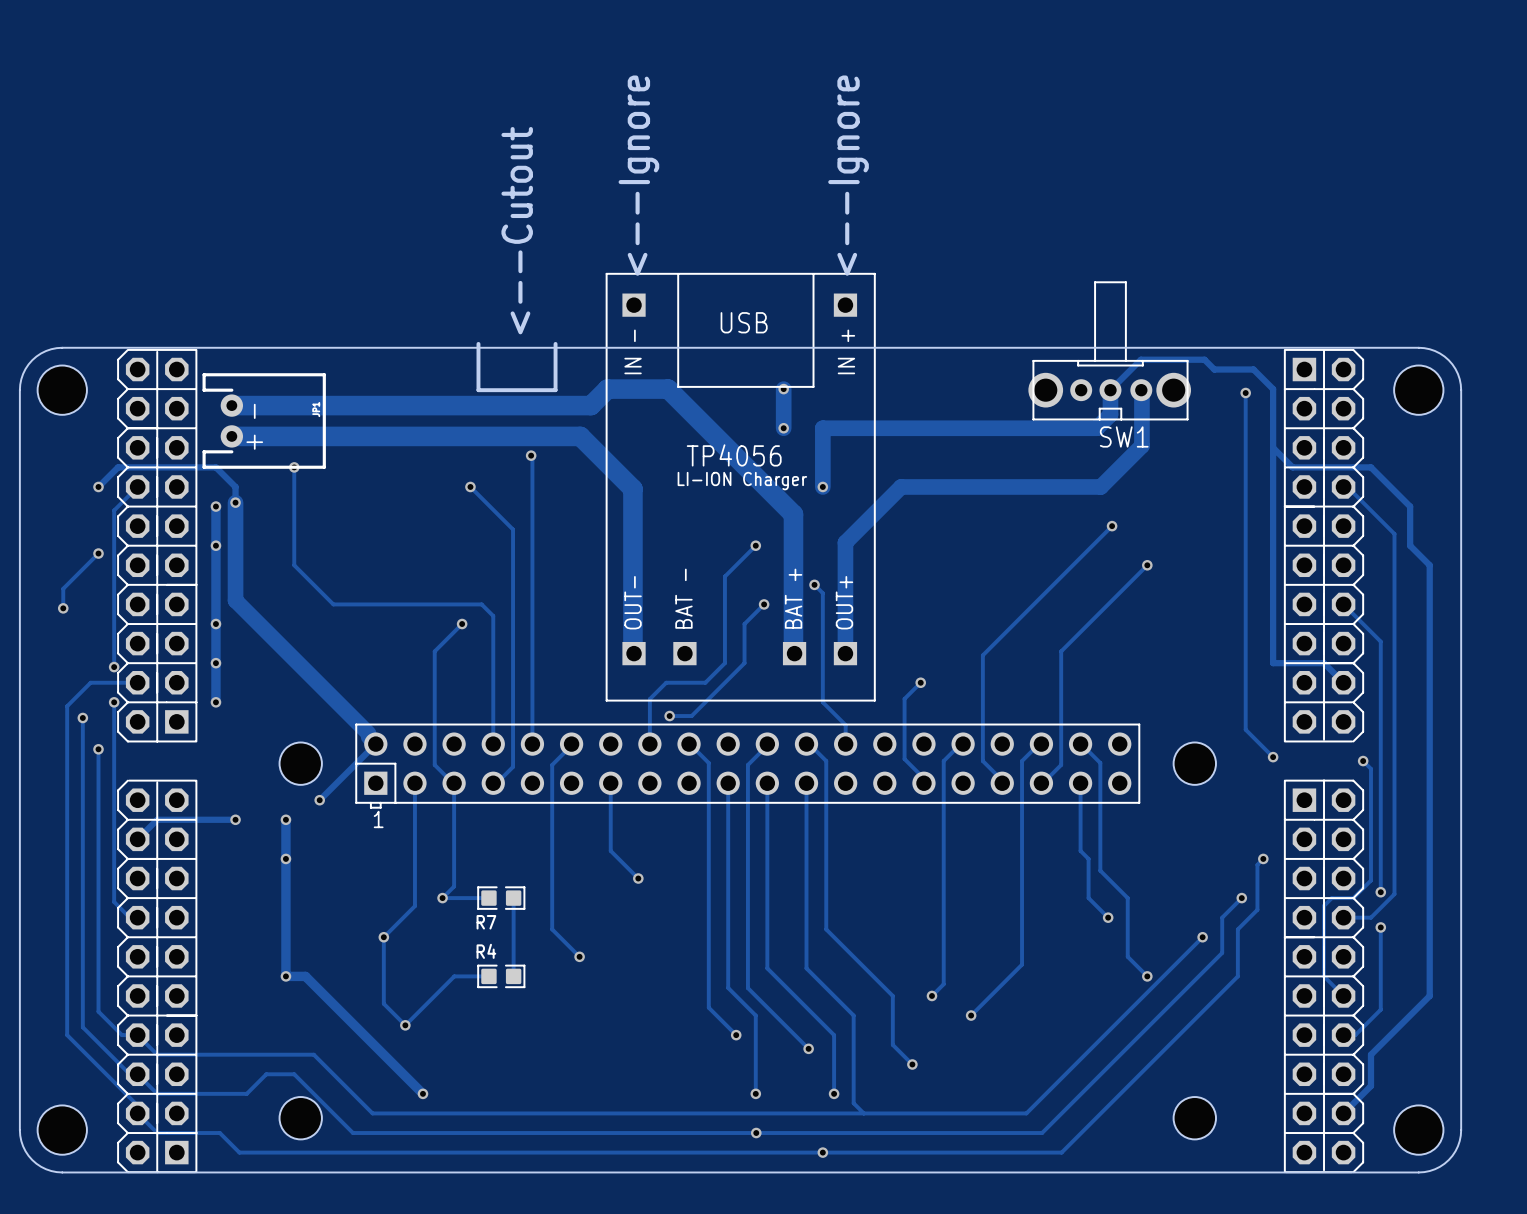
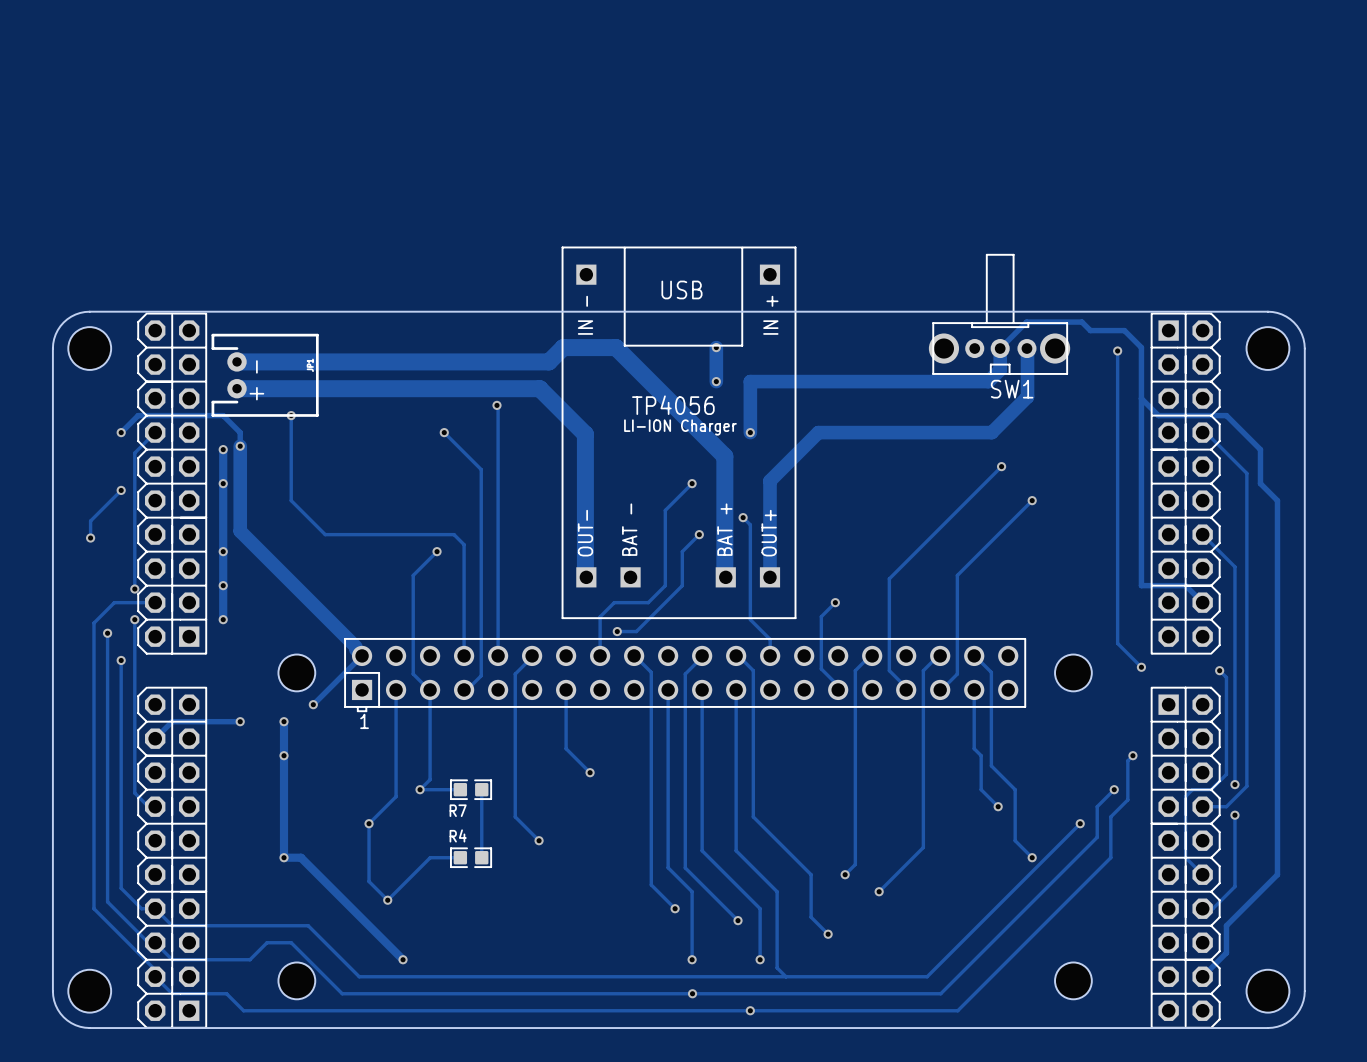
text: <--Ignore (638, 175) -> none
text: <--Ignore (848, 175) -> none
text: <--Cutout (517, 230) -> none
board edge: (478, 343) (478, 390) (555, 390) (555, 343) -> none

